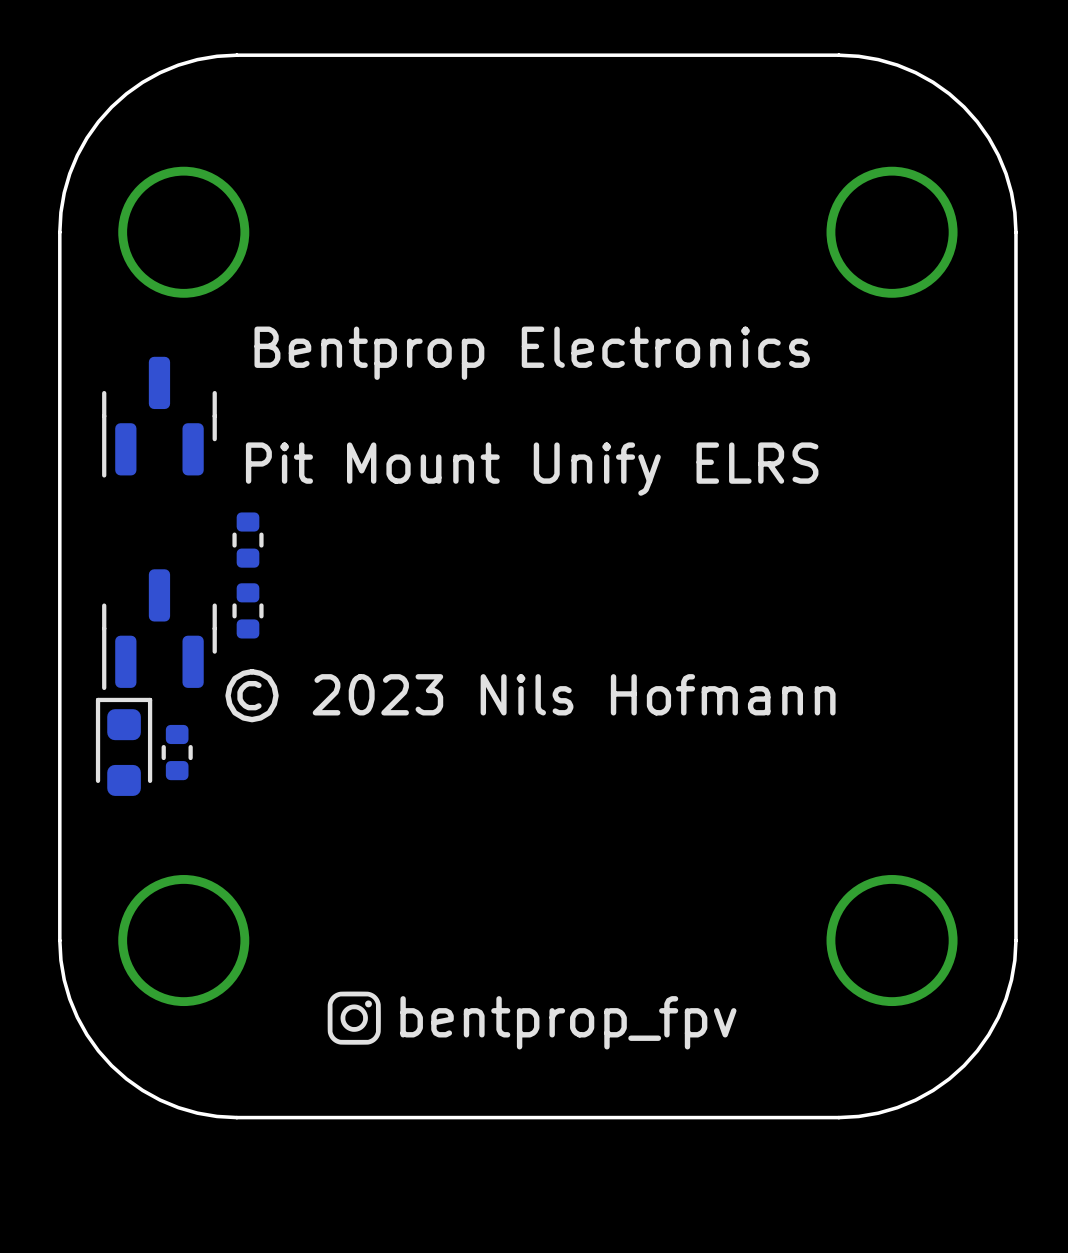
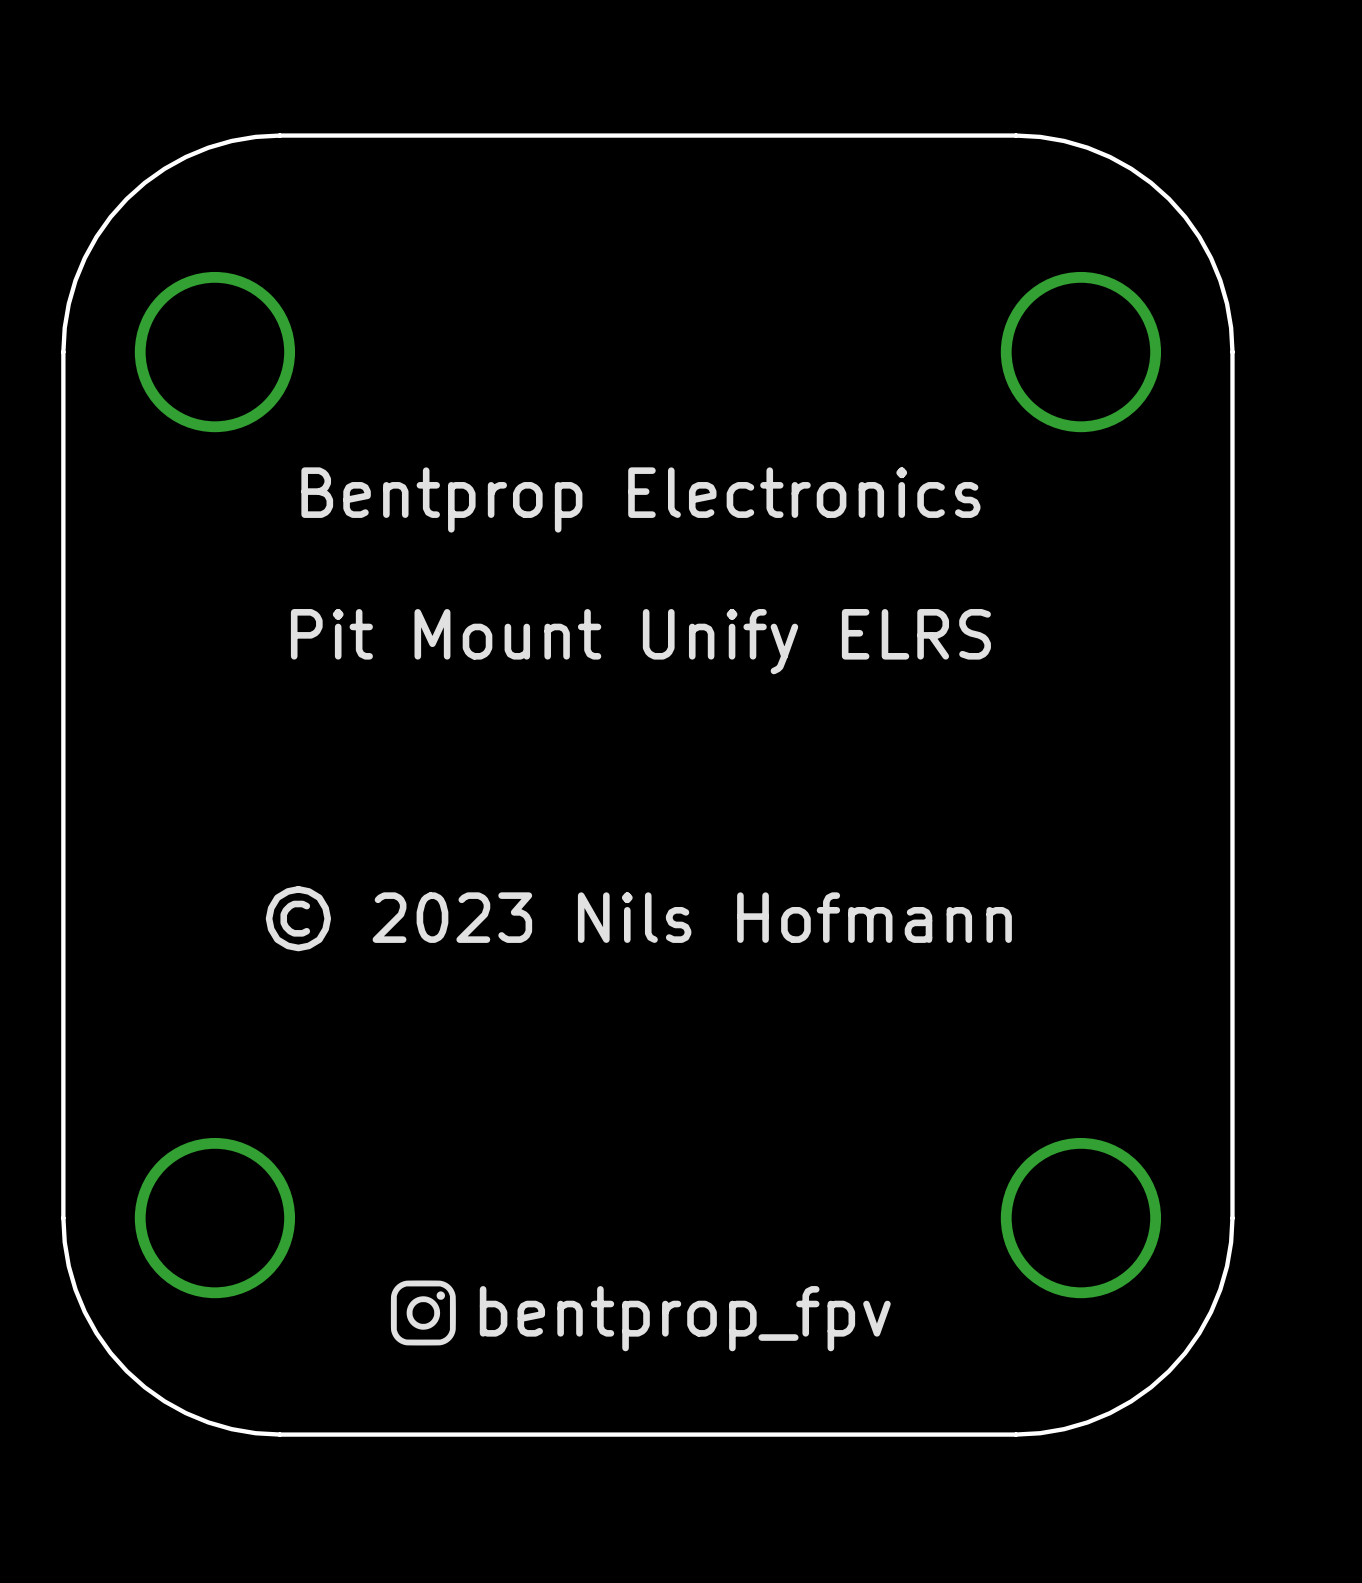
part: (159, 417) -> none
part: (248, 540) -> none
part: (248, 610) -> none
part: (159, 629) -> none
part: (124, 746) -> none
part: (177, 752) -> none

